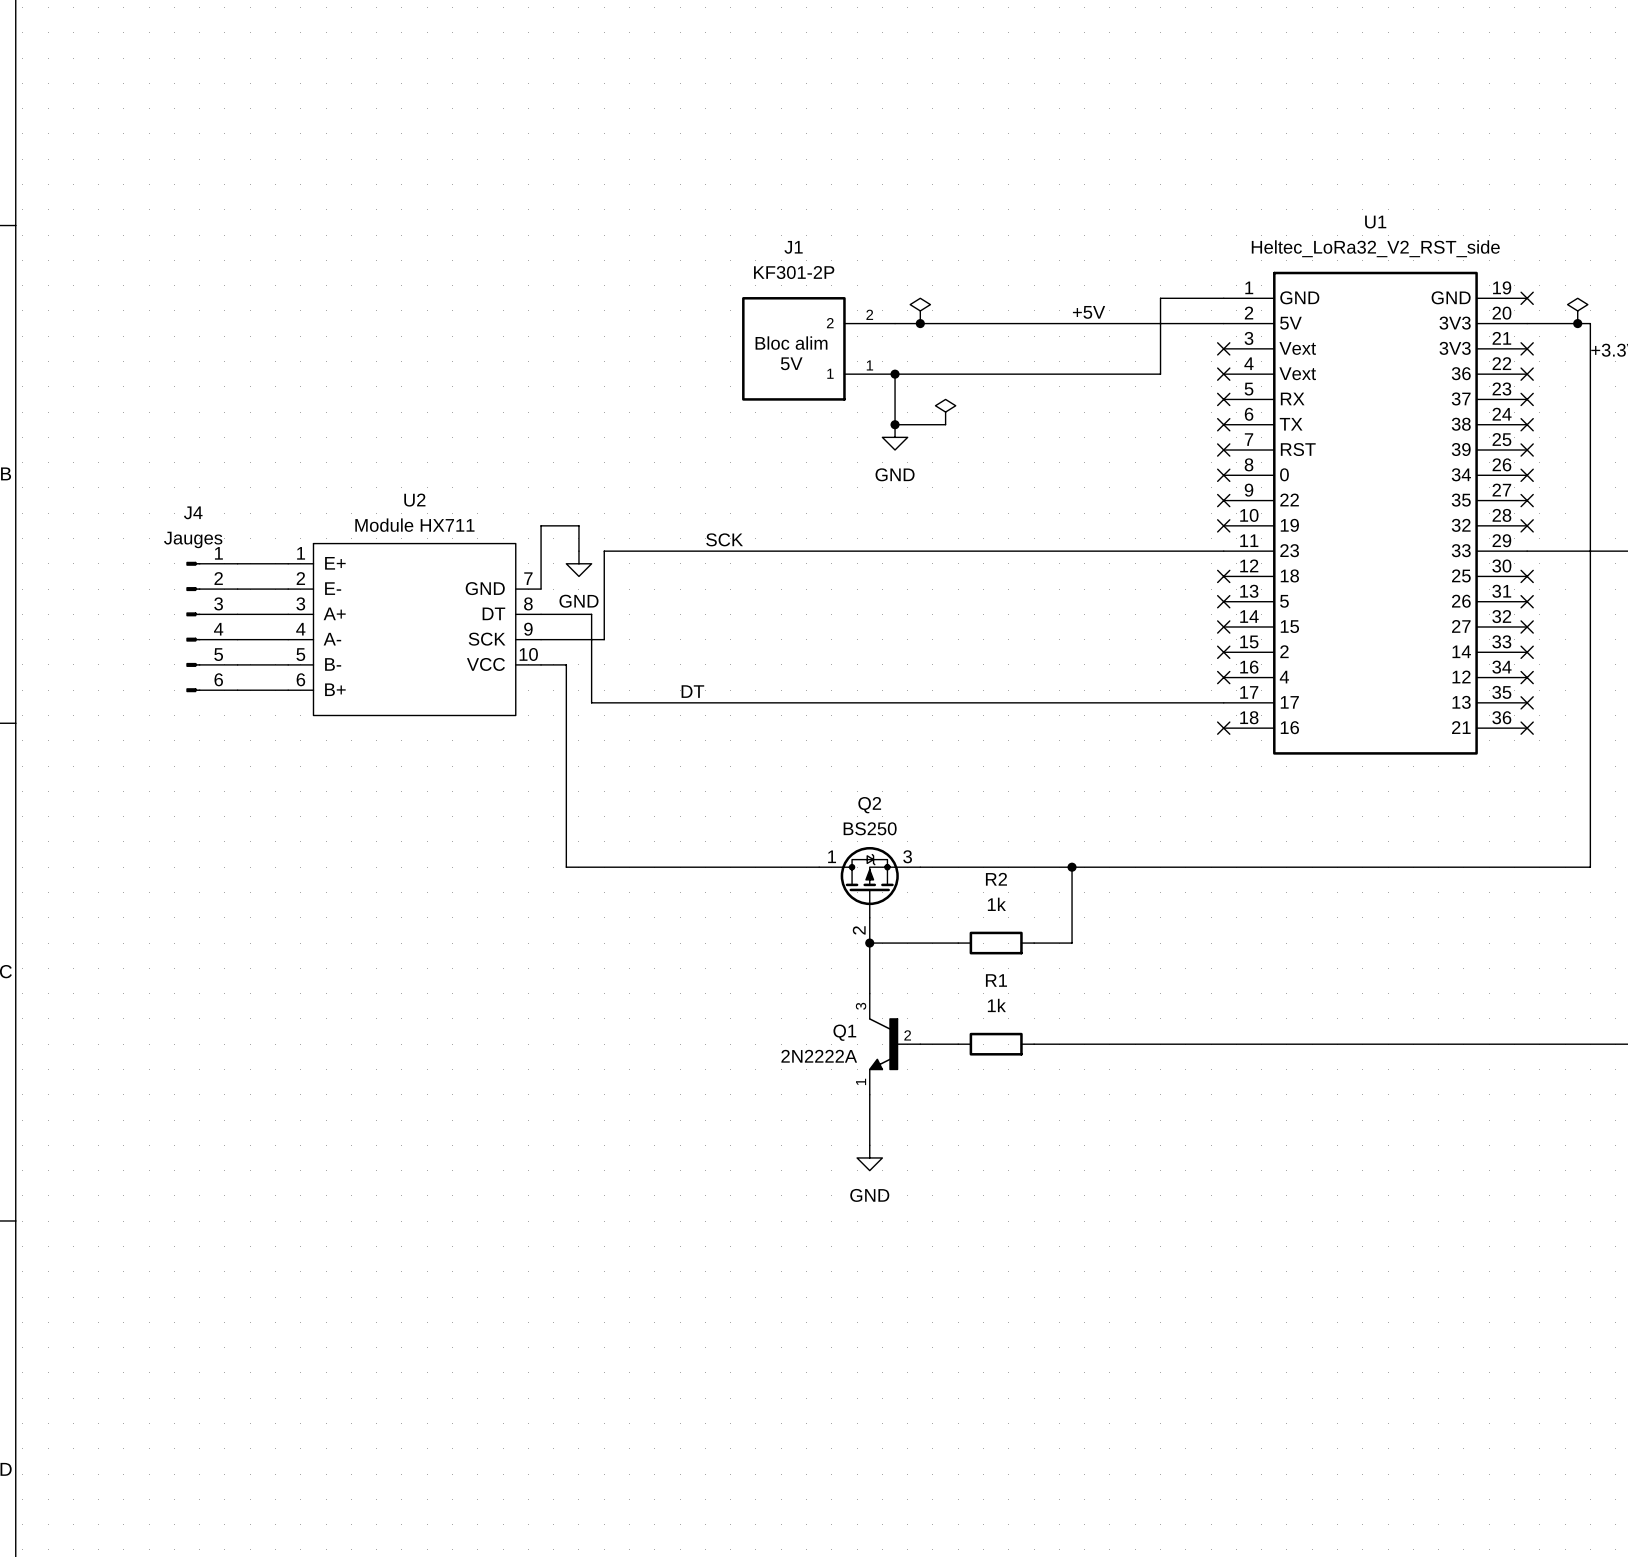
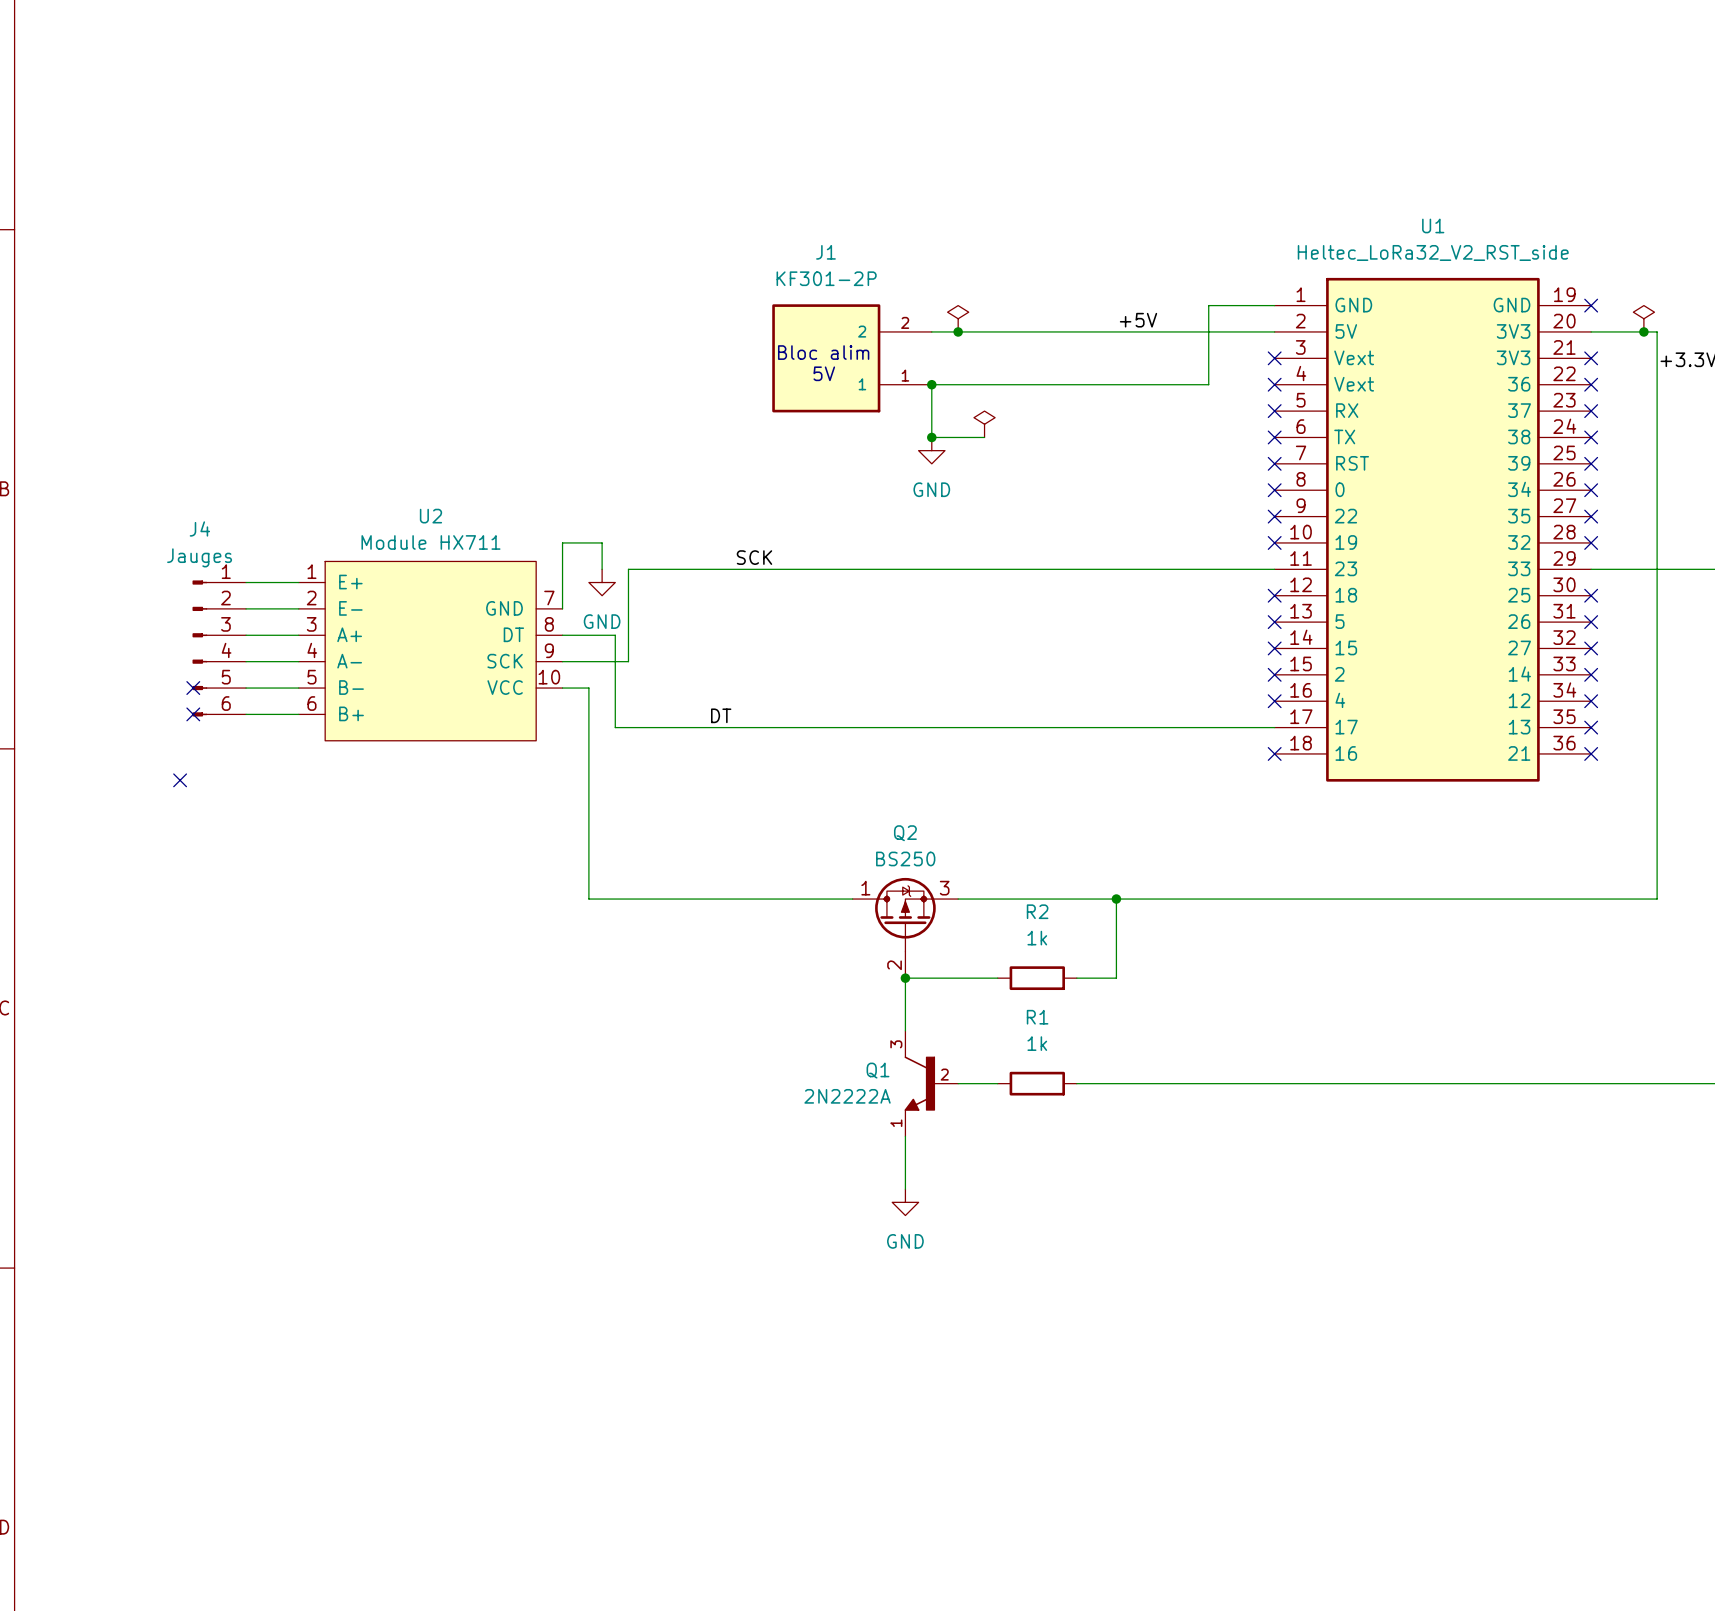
no-connect mark: none -> (193, 688)
no-connect mark: none -> (193, 714)
no-connect mark: none -> (180, 780)

